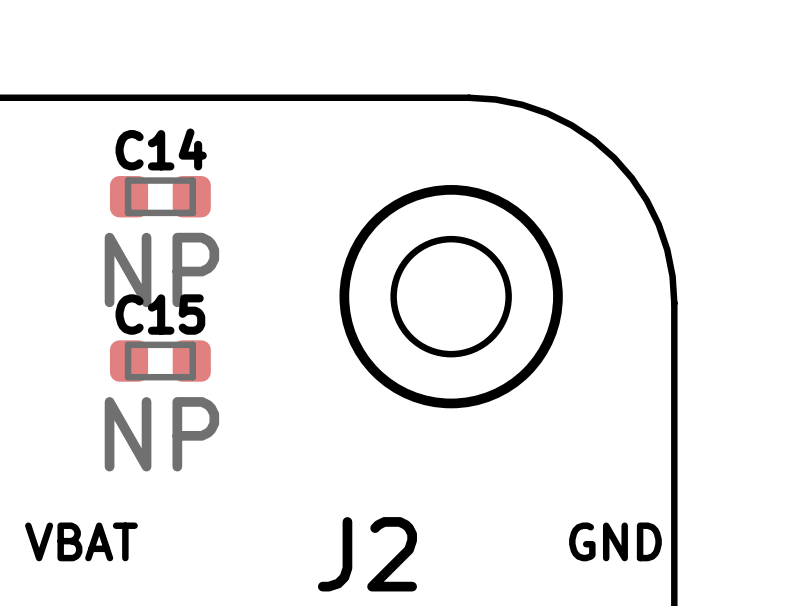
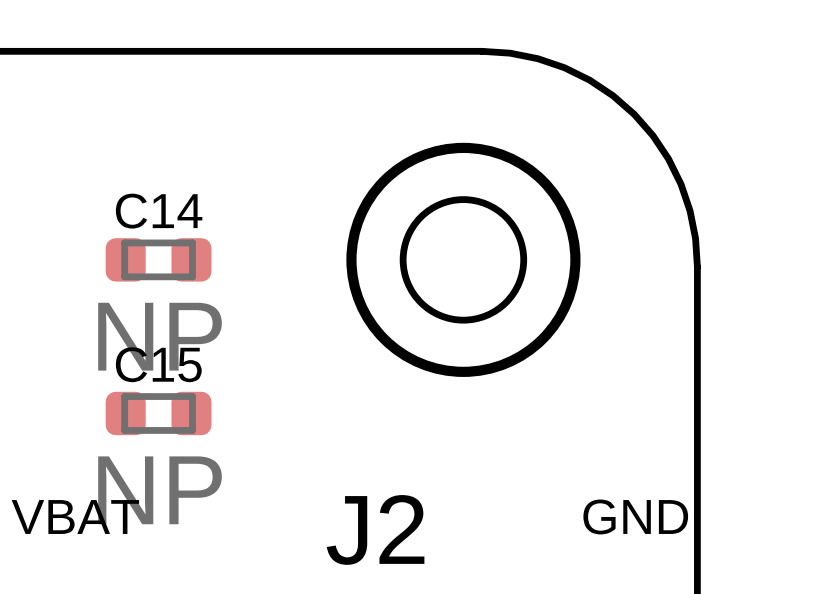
C14 position: (160, 196) -> (158, 259)
C15 position: (160, 361) -> (158, 413)

